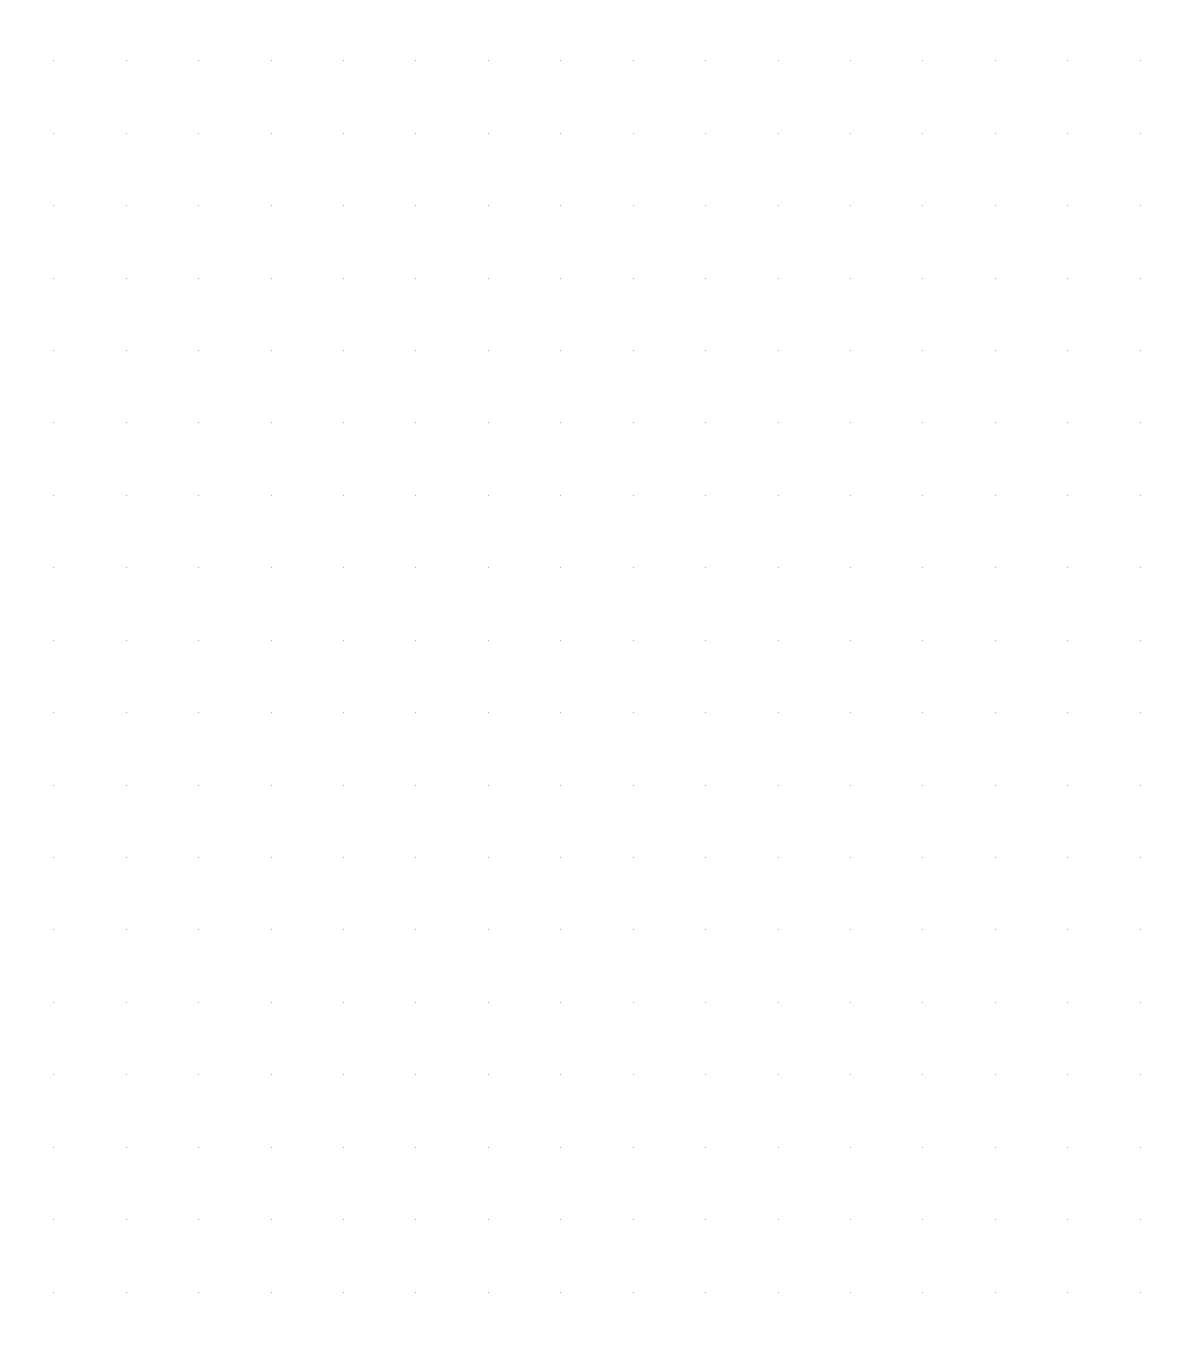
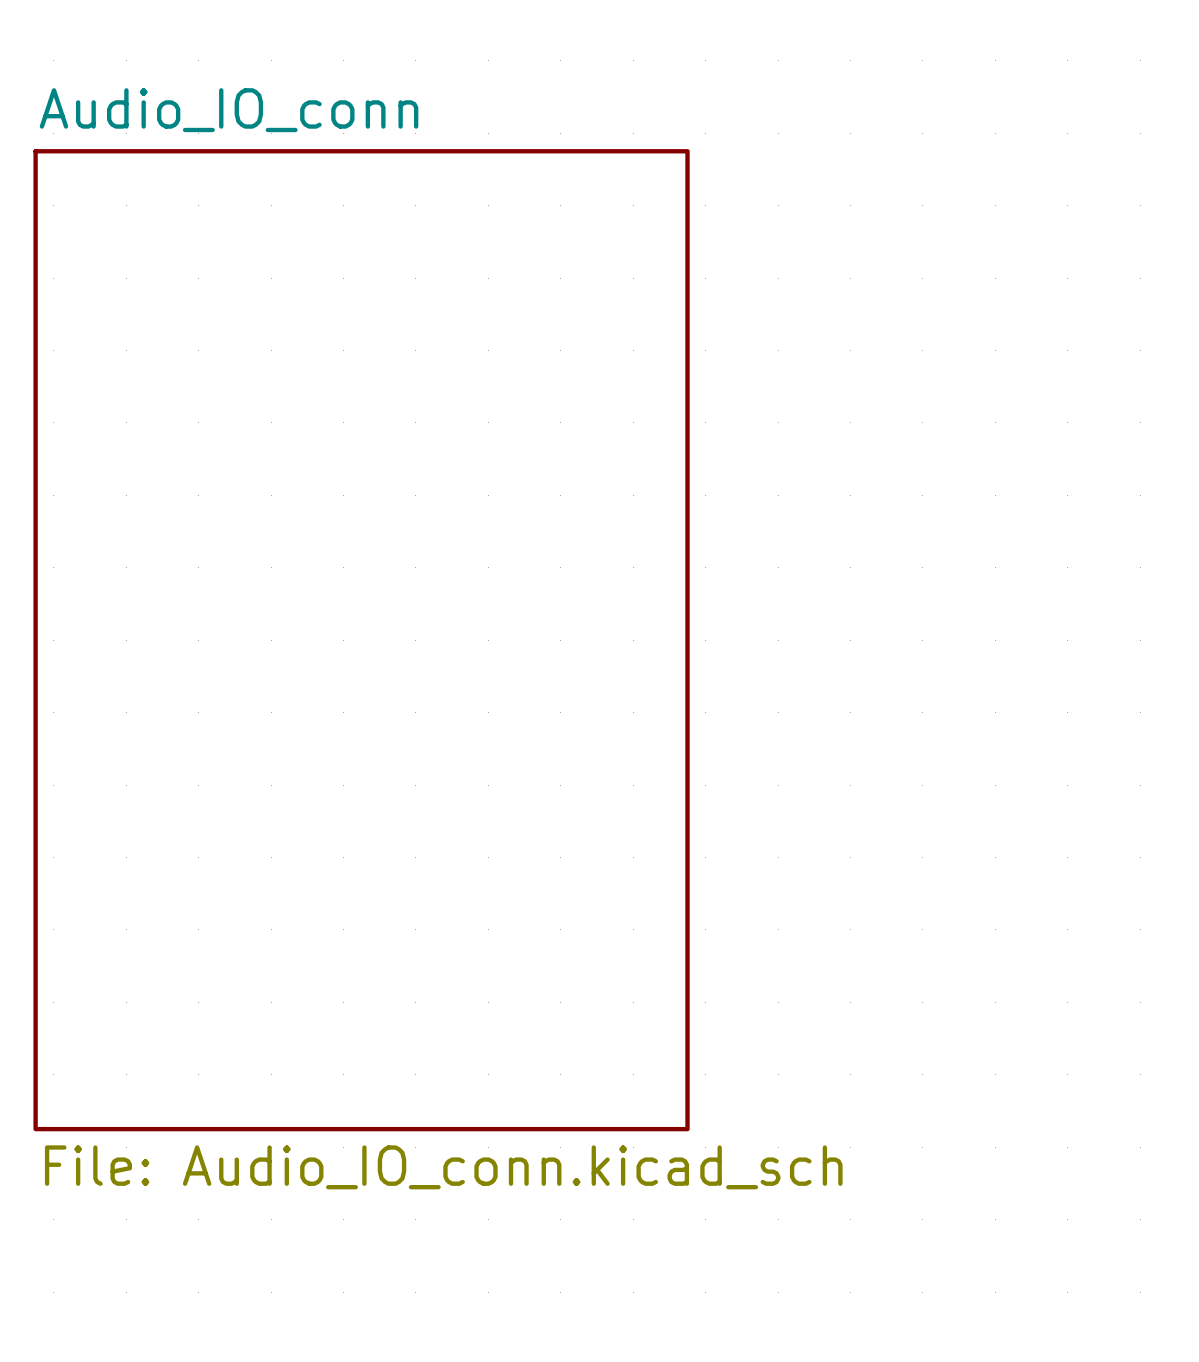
sheet Audio_IO_conn: none -> File: Audio_IO_conn.kicad_sch (361, 640)

